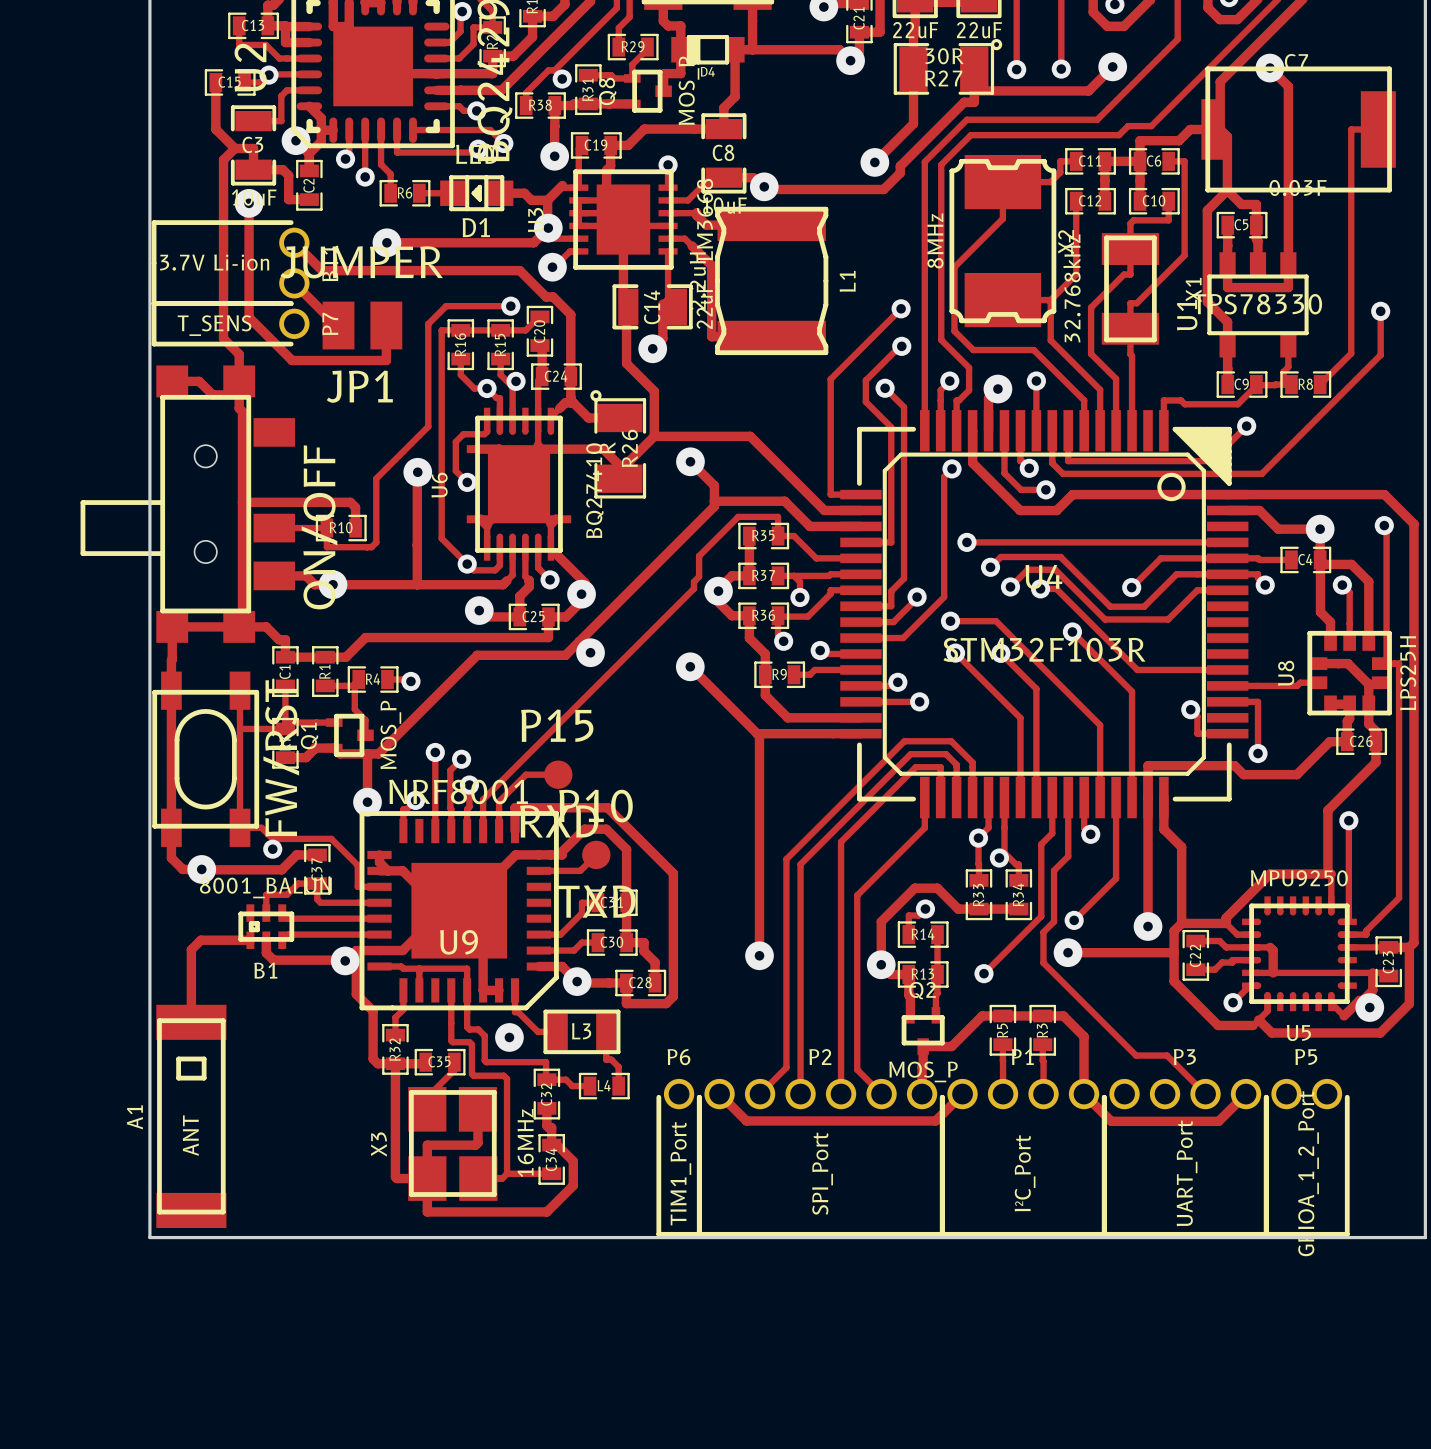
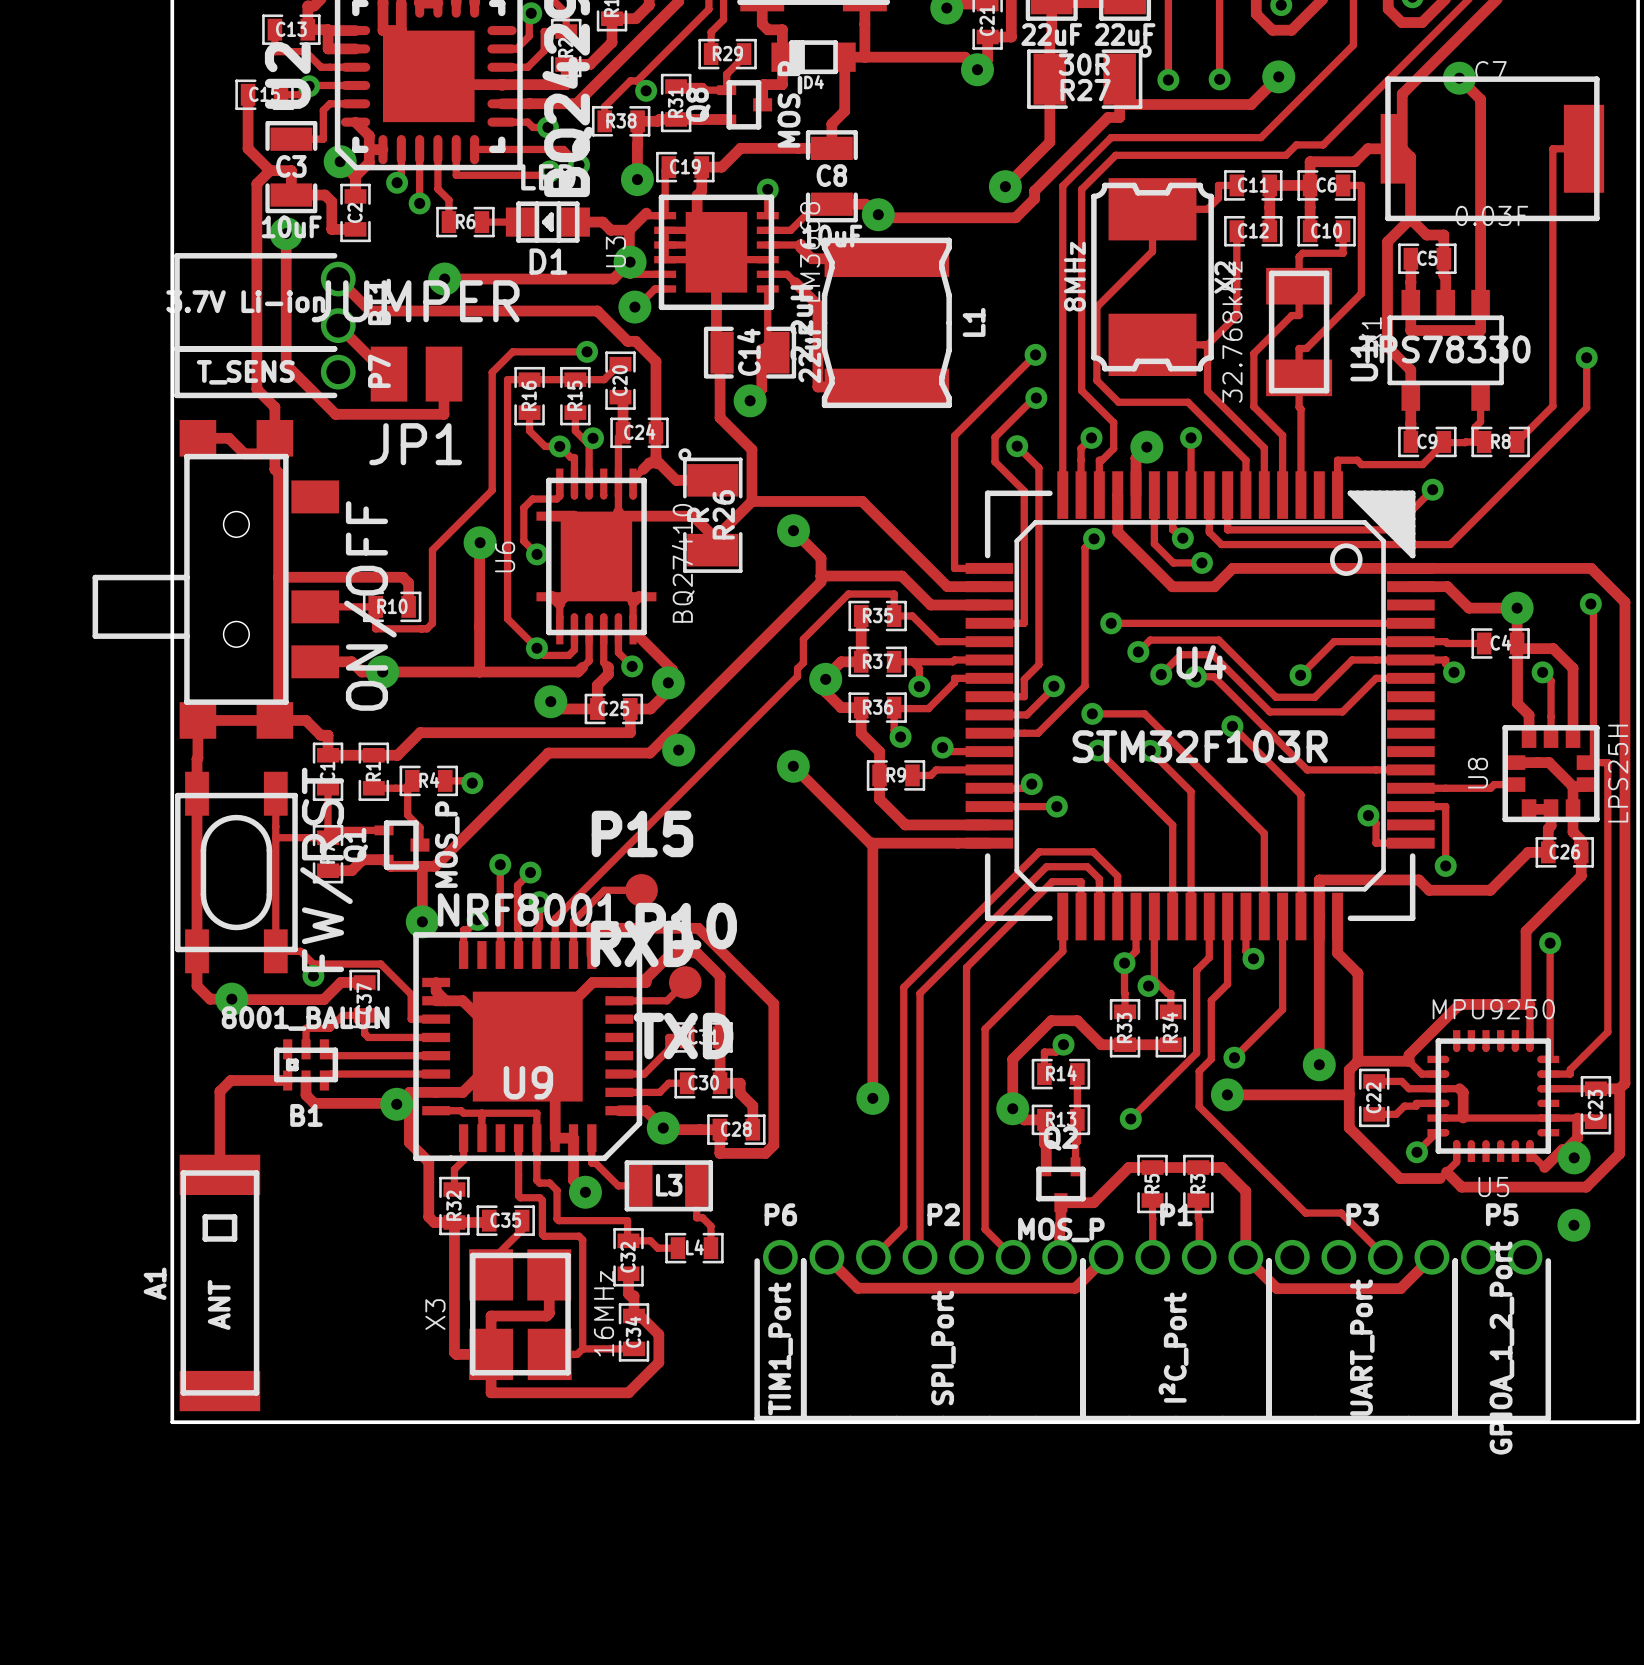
track: none -> (573, 1138) (573, 1180) (584, 1191)
via: none -> (1573, 1225)

